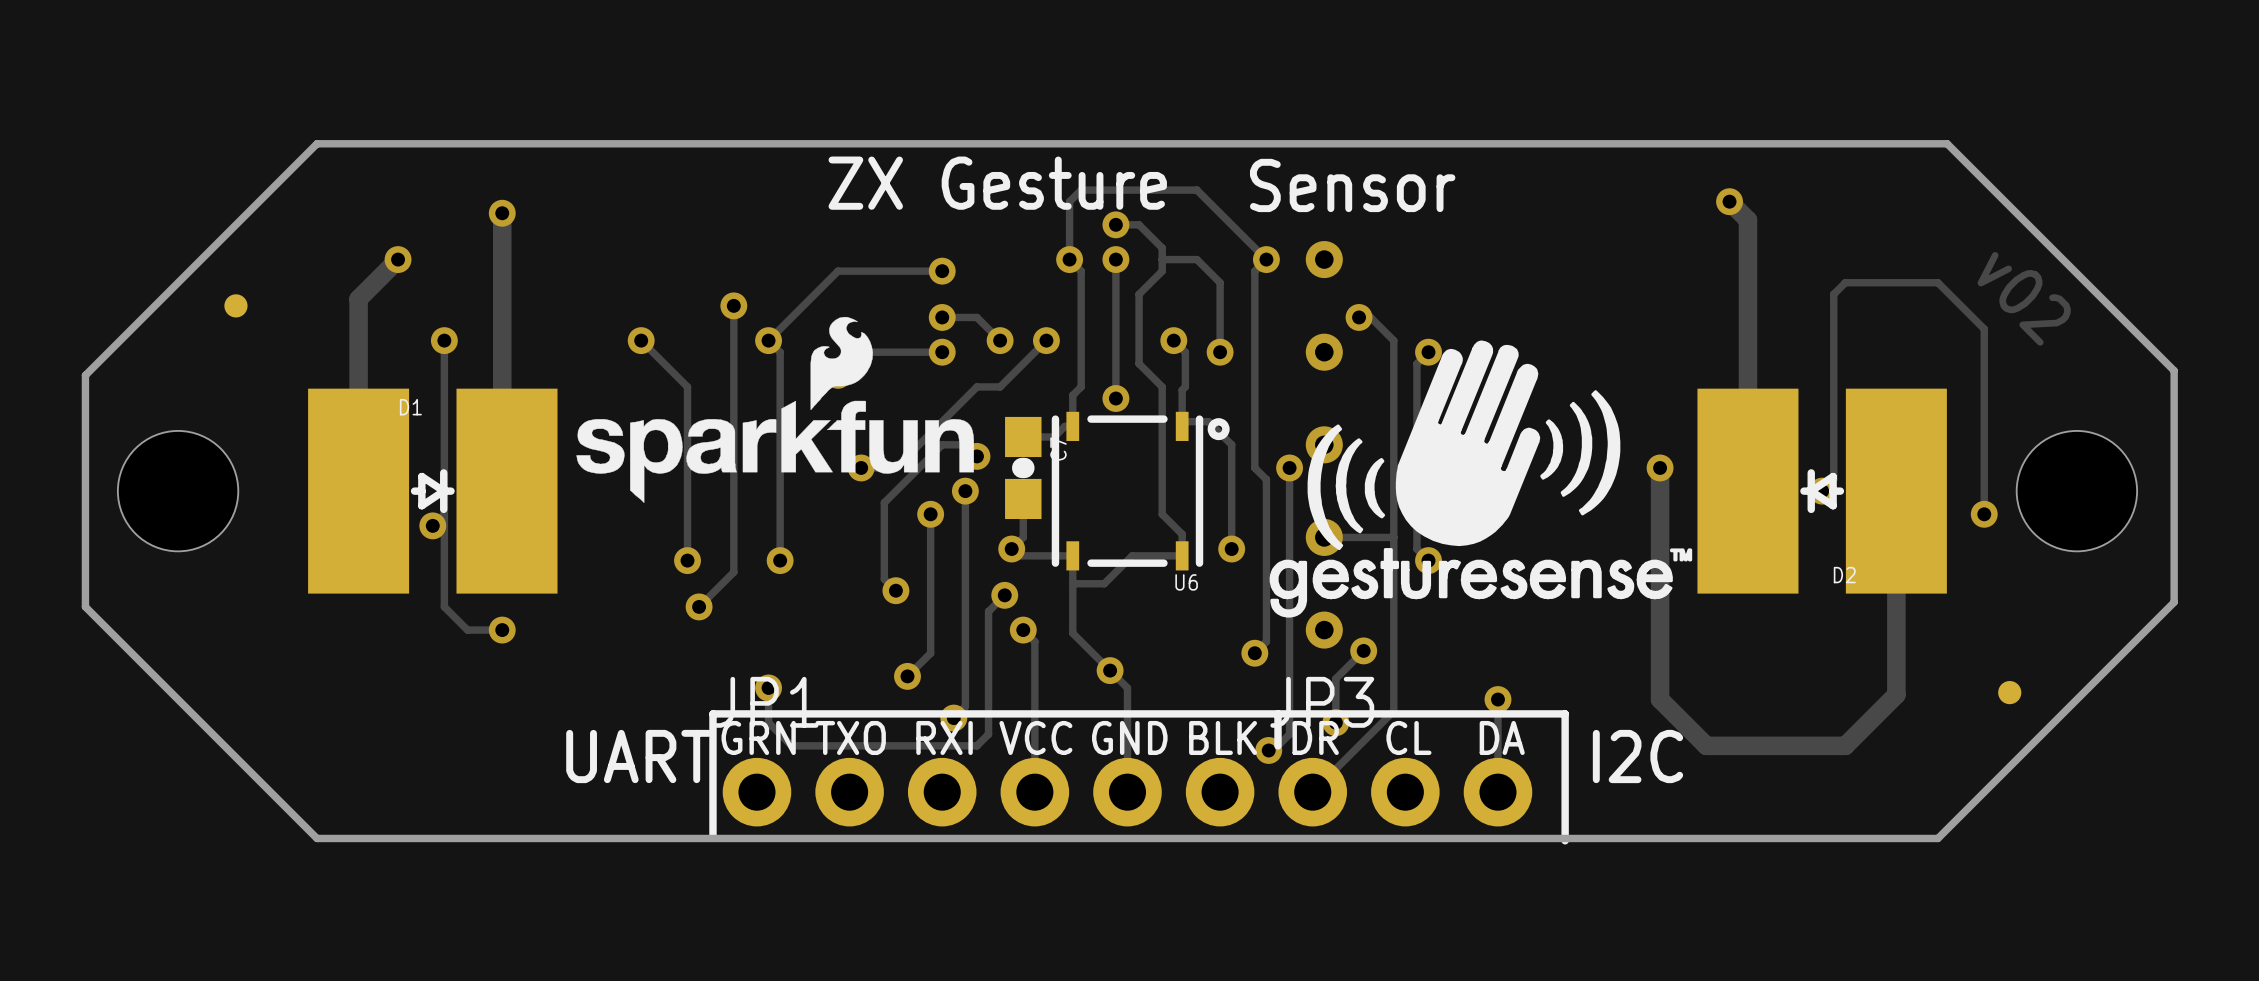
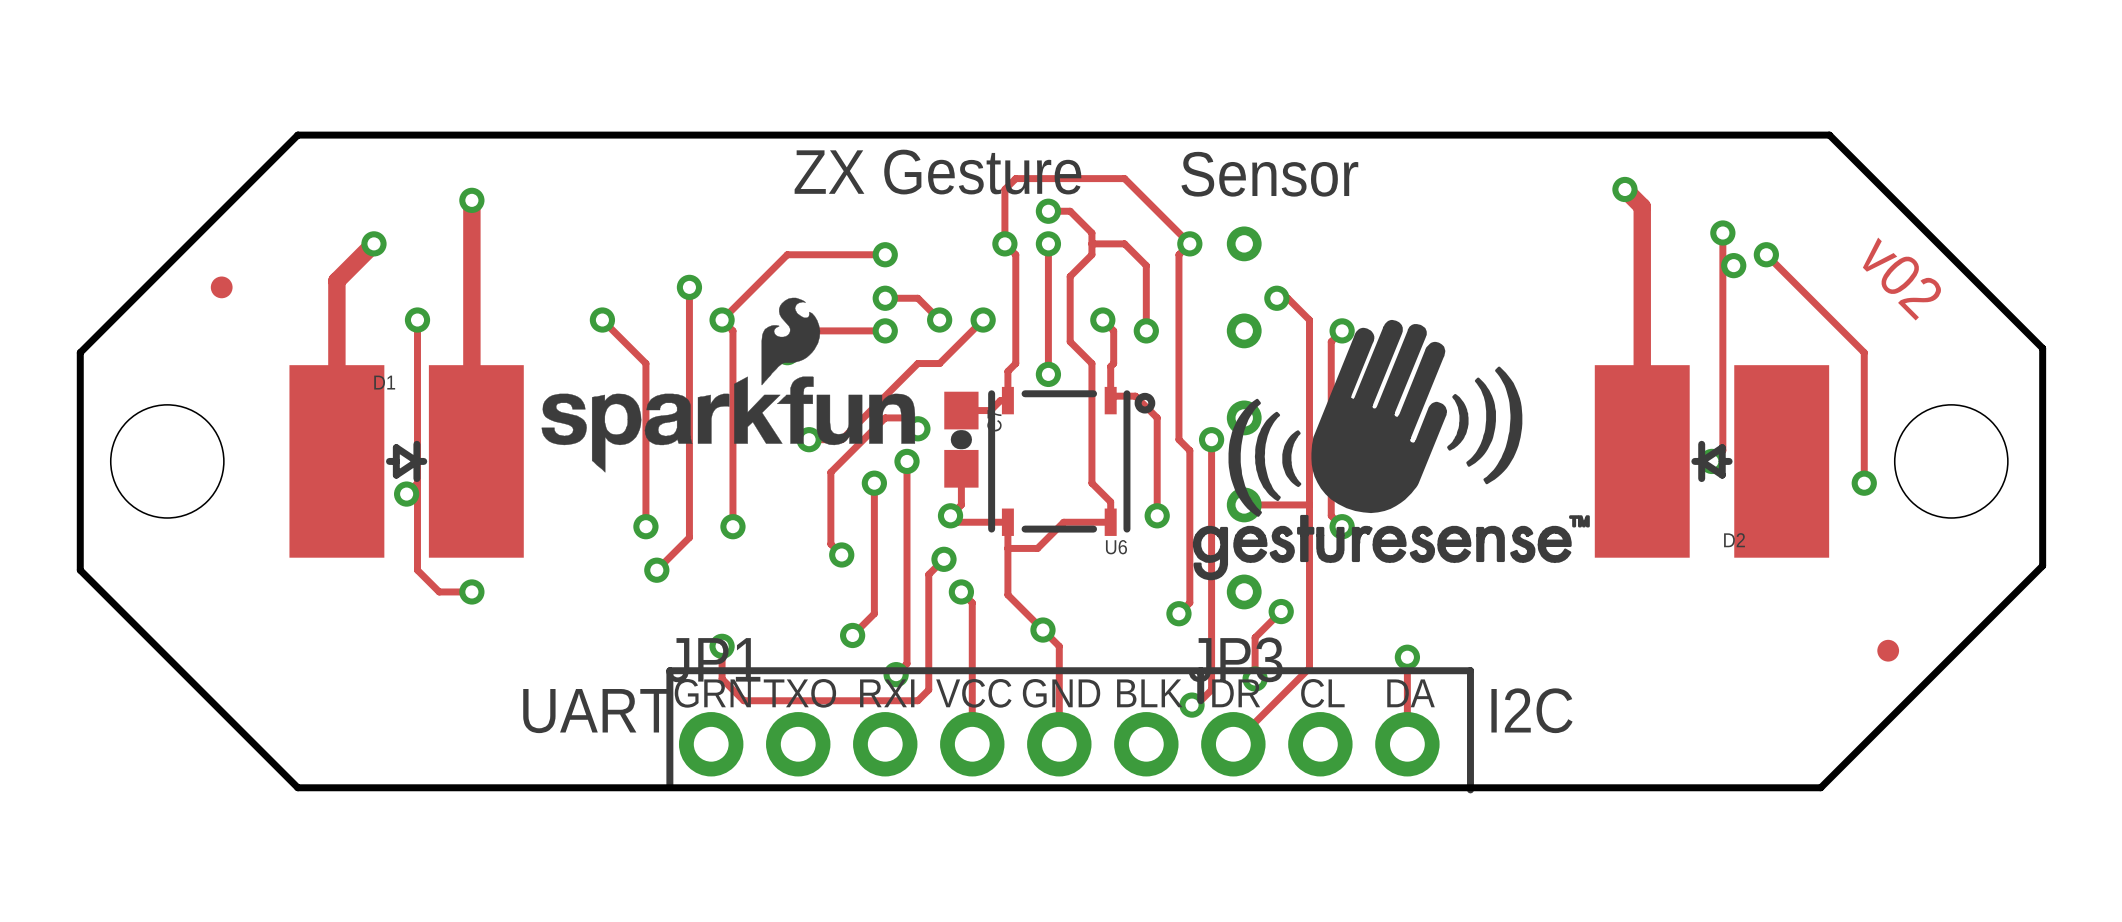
track: none -> (1722, 232) (1722, 276)
via: none -> (1722, 232)
via: none -> (1766, 254)
via: none -> (1733, 265)
track: (1833, 294) (1845, 282) (1937, 282) (1984, 329) (1984, 375) -> (1766, 254) (1864, 352)
track: (1660, 467) (1660, 699) (1706, 745) (1845, 745) (1896, 694) (1896, 491) -> none
via: (1660, 467) -> none

